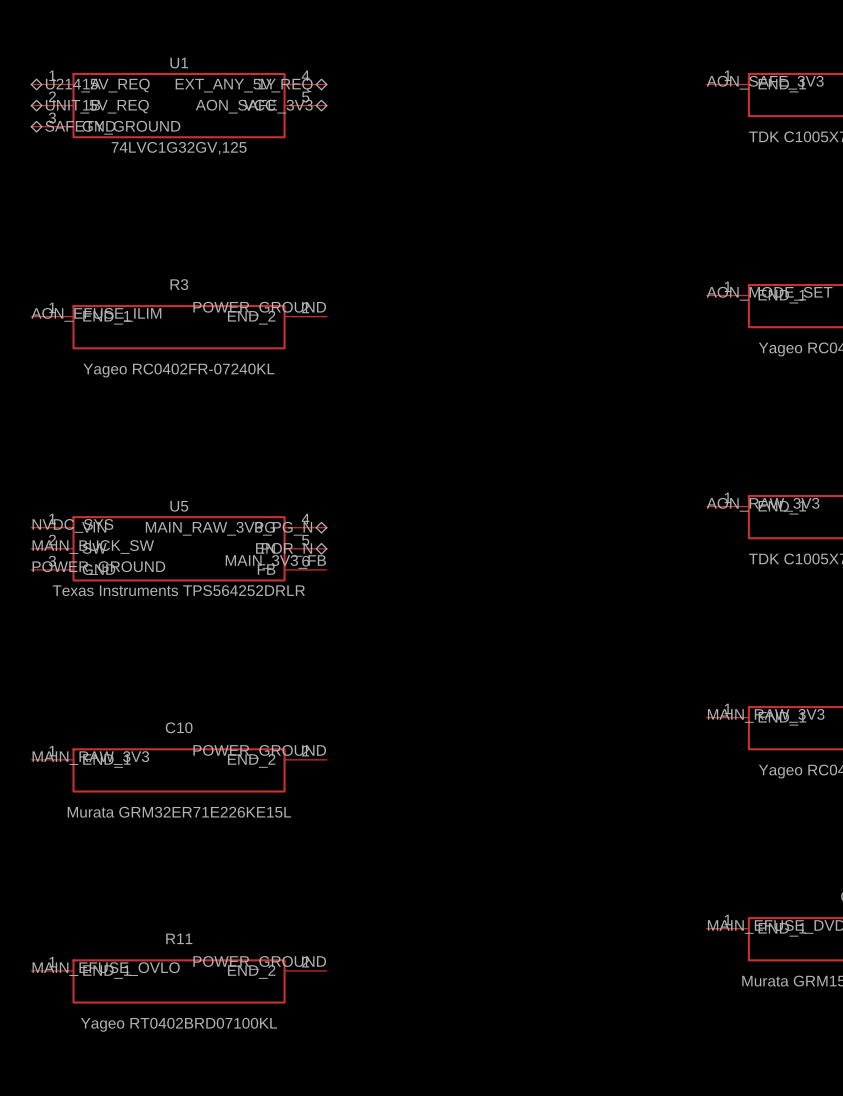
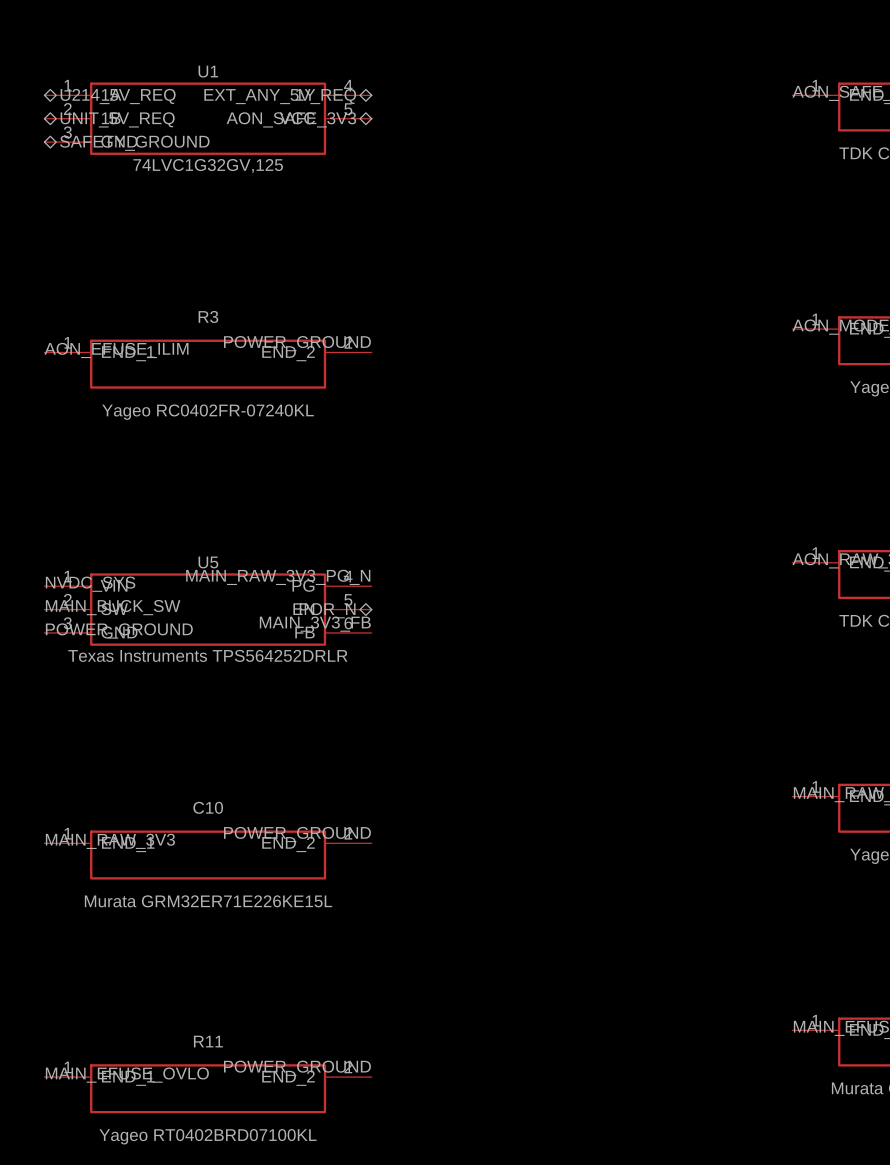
label: none -> MAIN_RAW_3V3_PG_N (278, 577)
hierarchical label: MAIN_RAW_3V3_PG_N (228, 528) -> none

